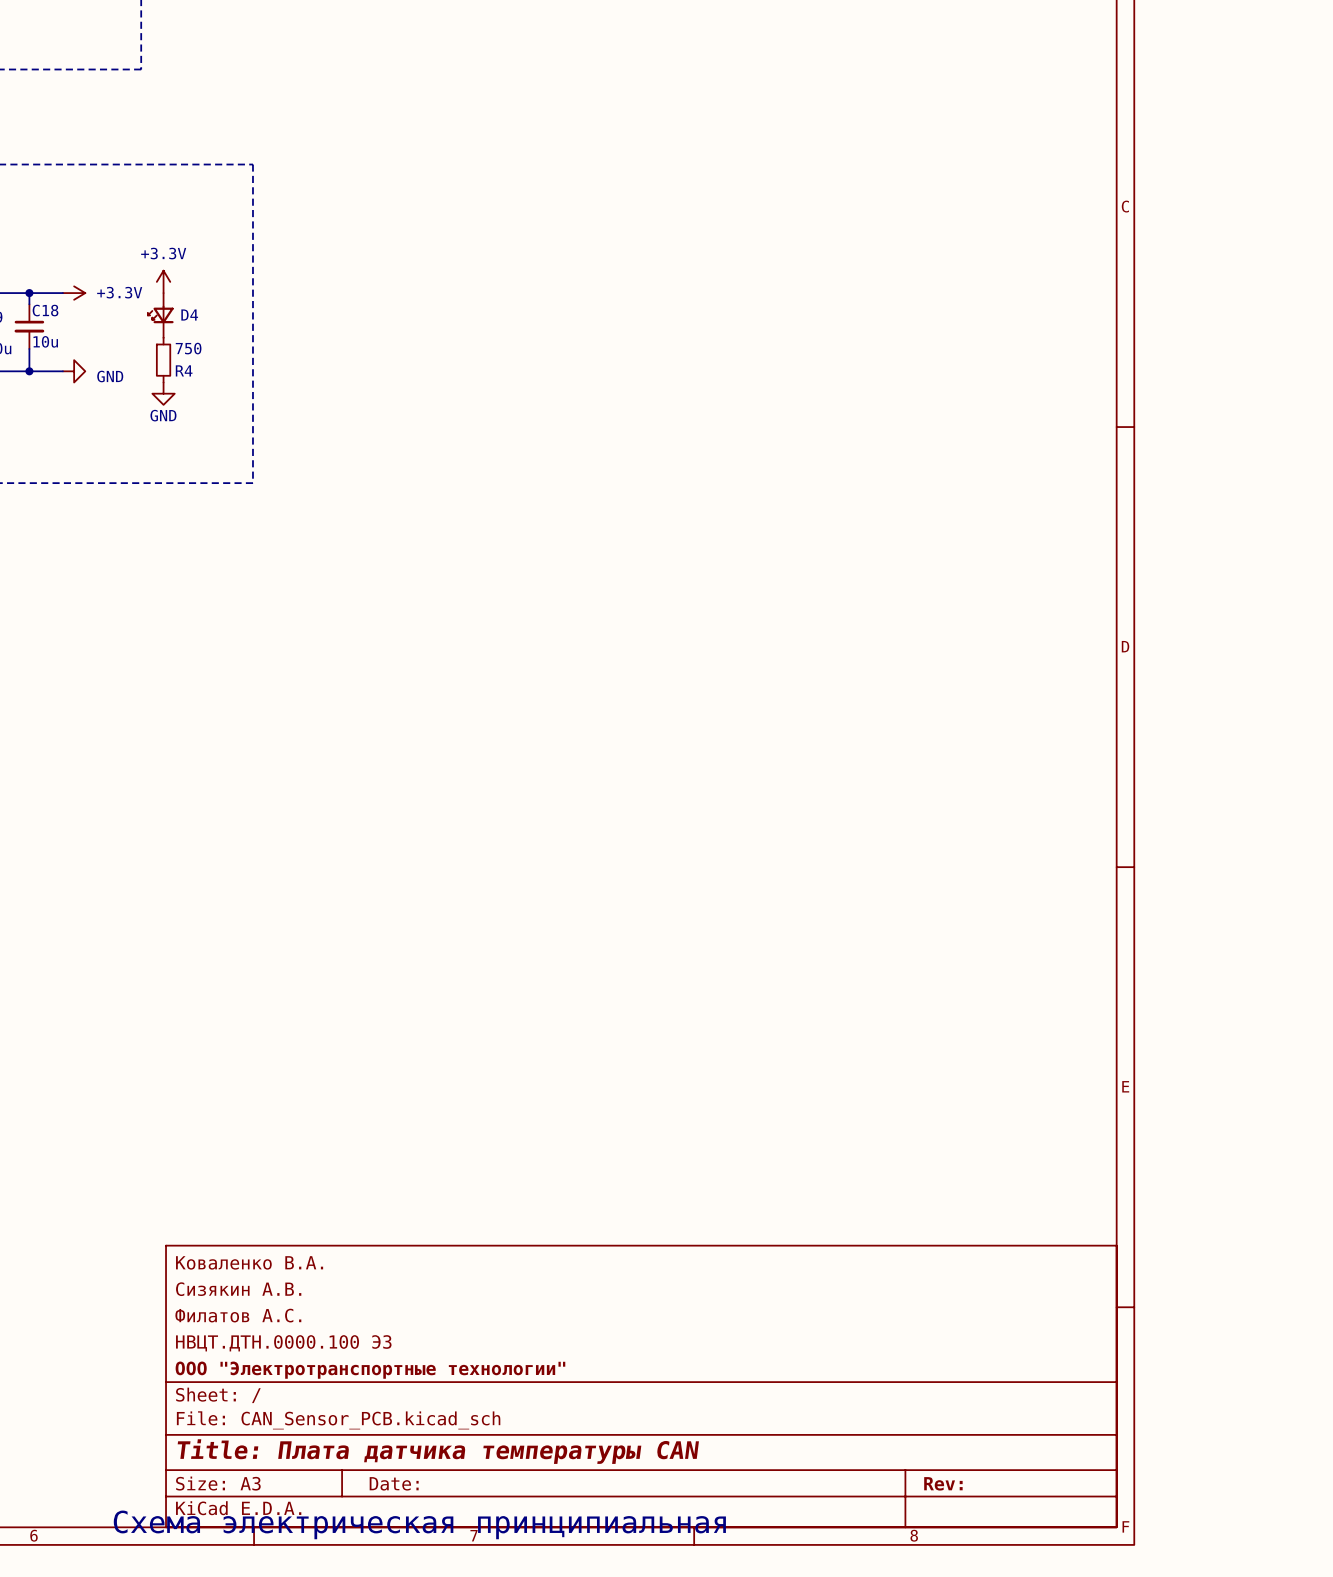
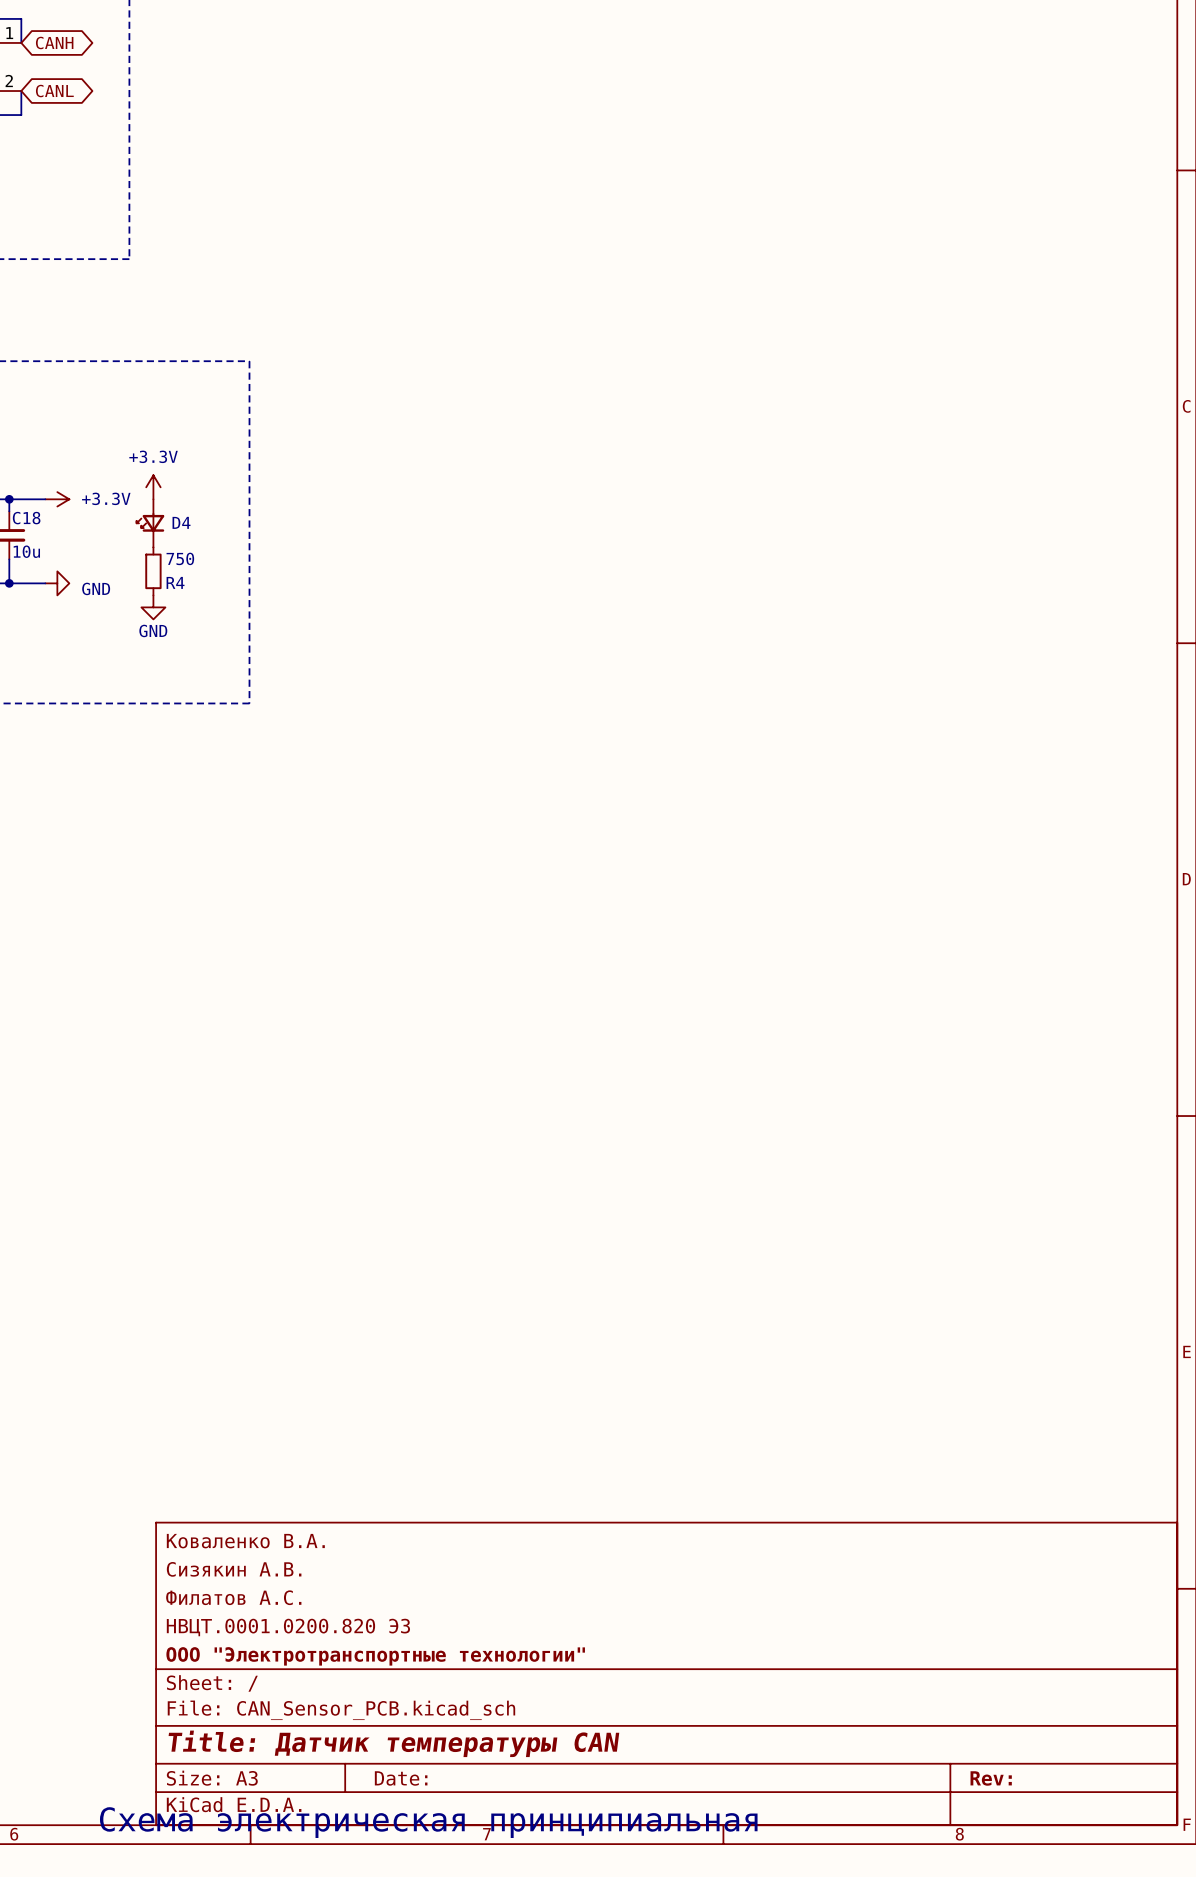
title block: НВЦТ.ДТН.0000.100 Э3 (283, 1343) -> НВЦТ.0001.0200.820 Э3 (288, 1627)
title block: Title: Плата датчика температуры CAN (438, 1451) -> Title: Датчик температуры CAN (393, 1743)

